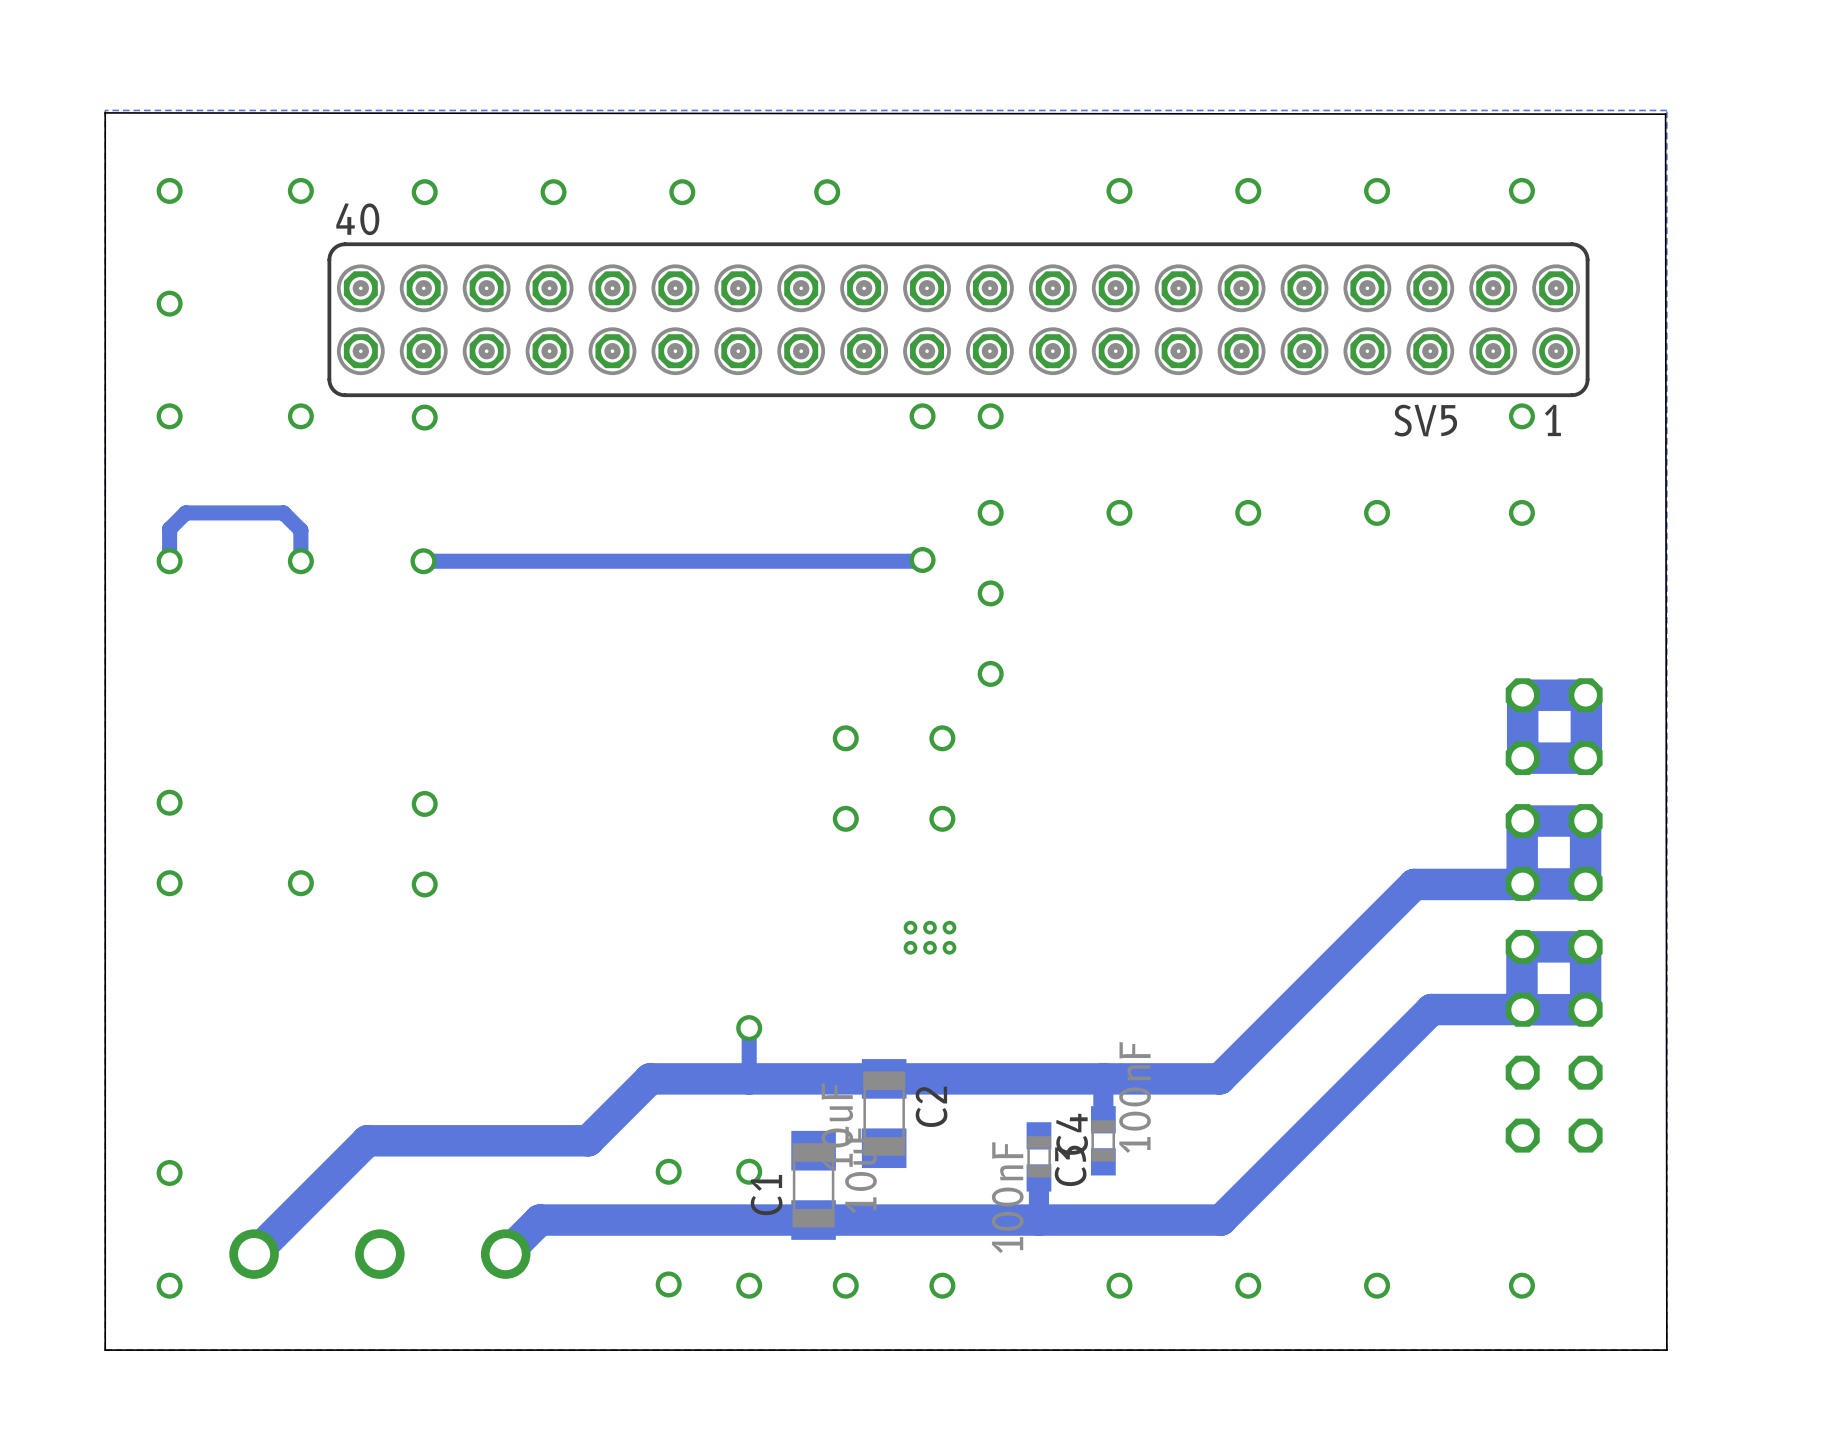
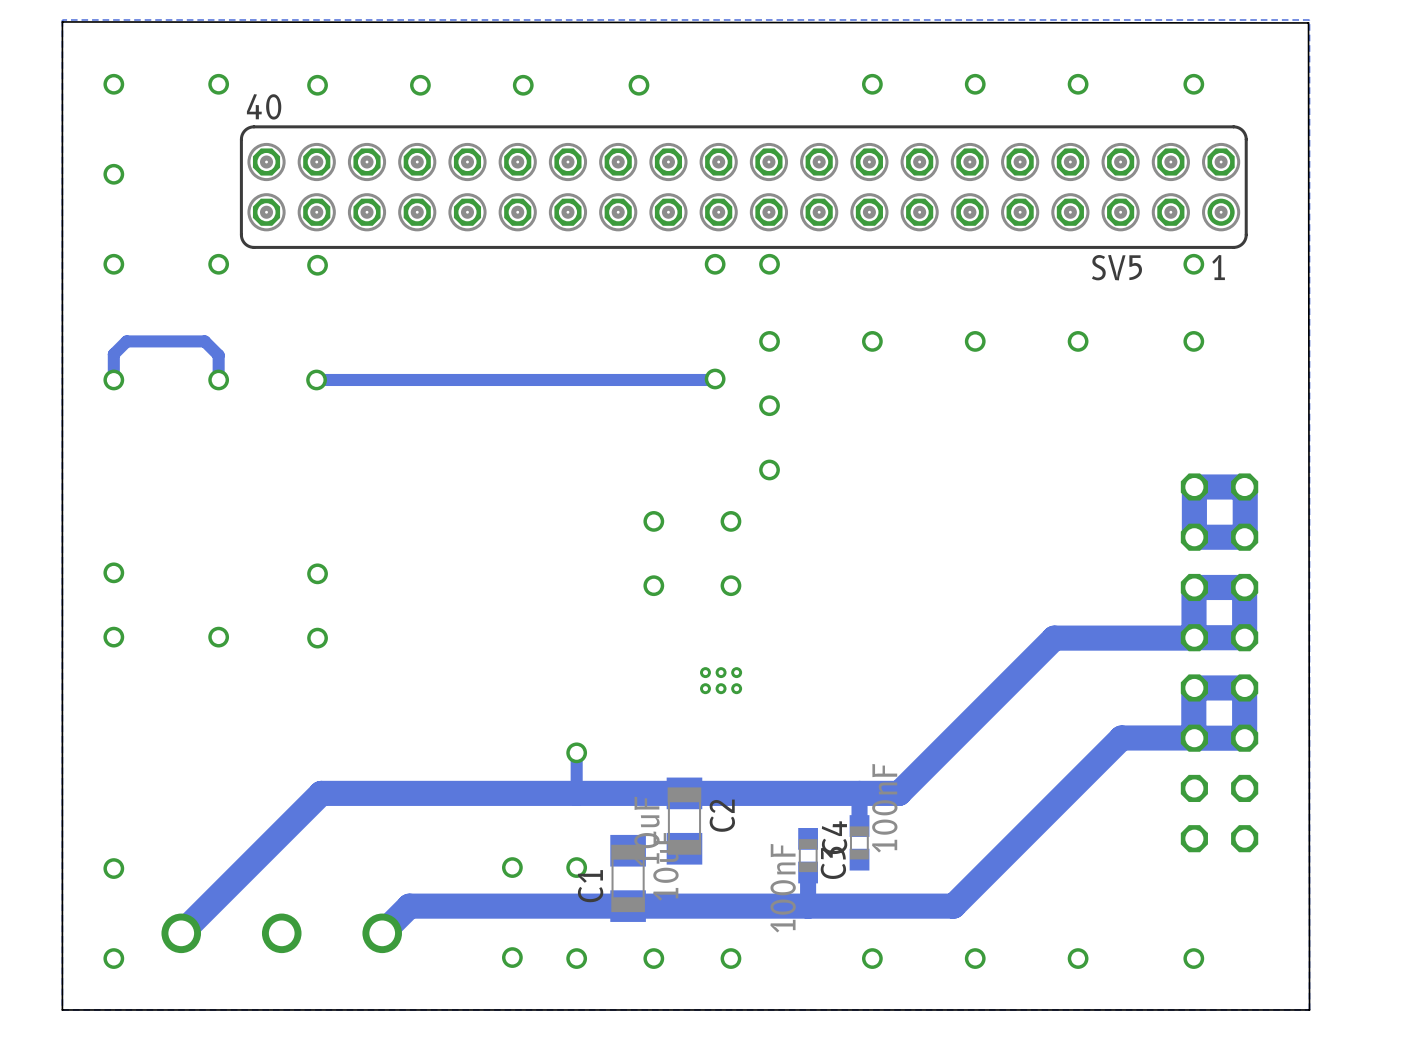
track: (1414, 884) (1219, 1078) (1152, 1078) -> (1107, 638) (1054, 638) (899, 793)
track: (650, 1078) (588, 1140) (367, 1140) -> (497, 793) (321, 793) (271, 842)

